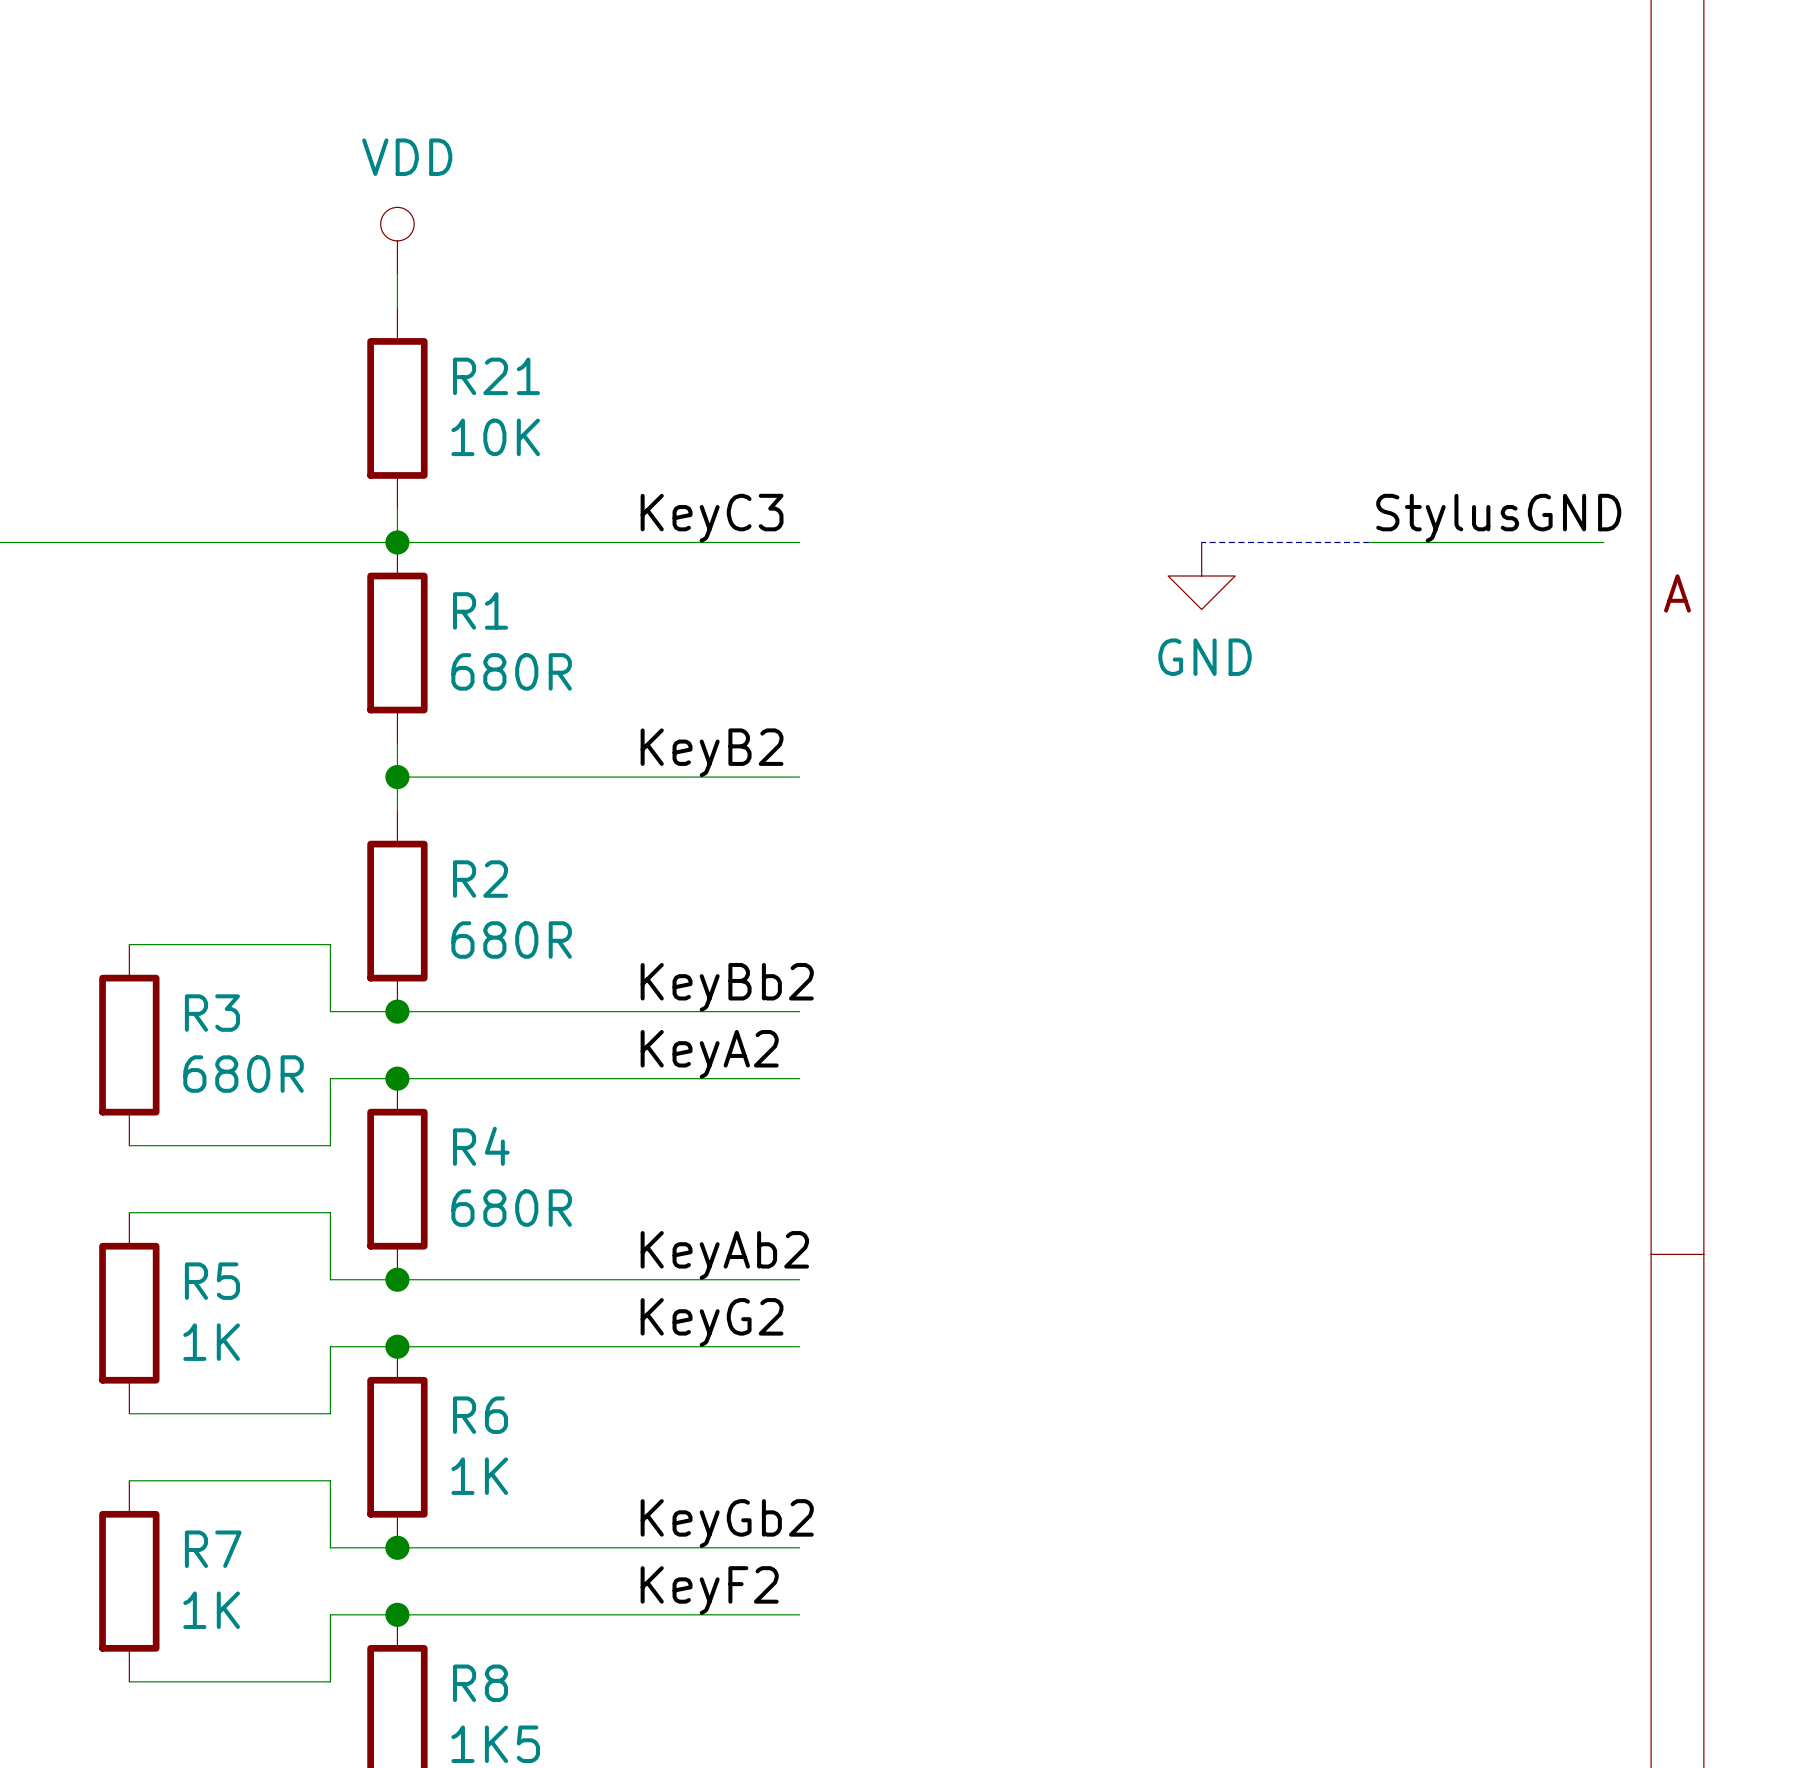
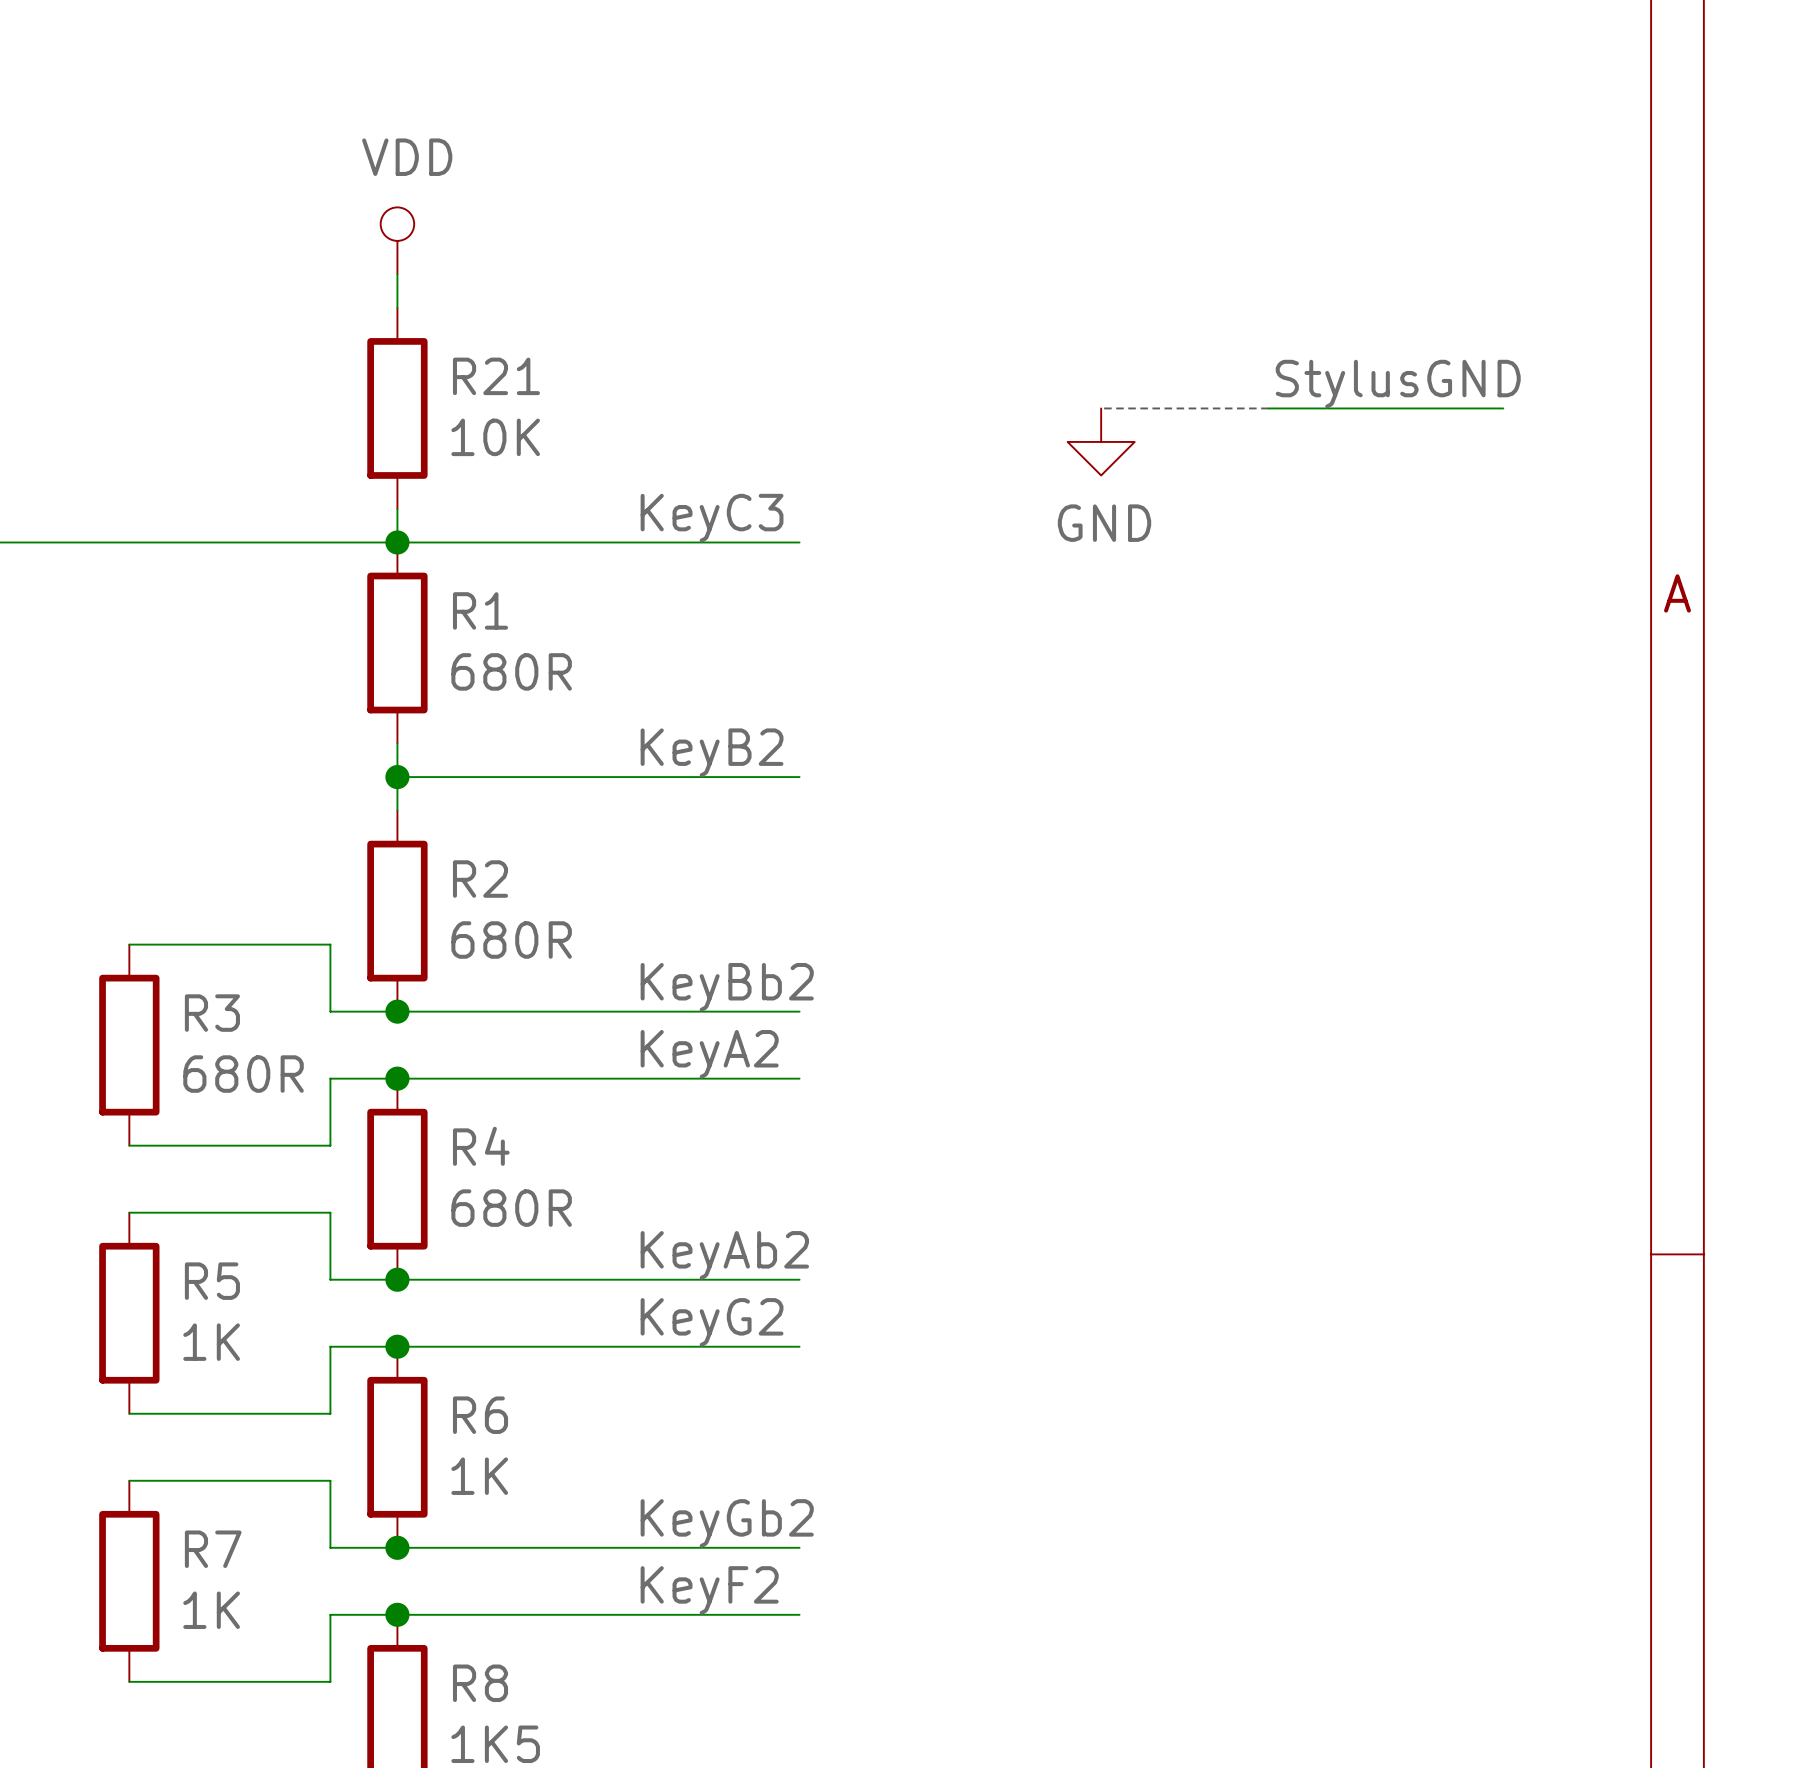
label position: StylusGND (1498, 518) -> StylusGND (1398, 384)
line: (1201, 542) (1369, 542) -> (1101, 408) (1268, 408)
wire: (1369, 542) (1603, 542) -> (1268, 408) (1503, 408)
power symbol position: GND (1201, 576) -> GND (1101, 441)

